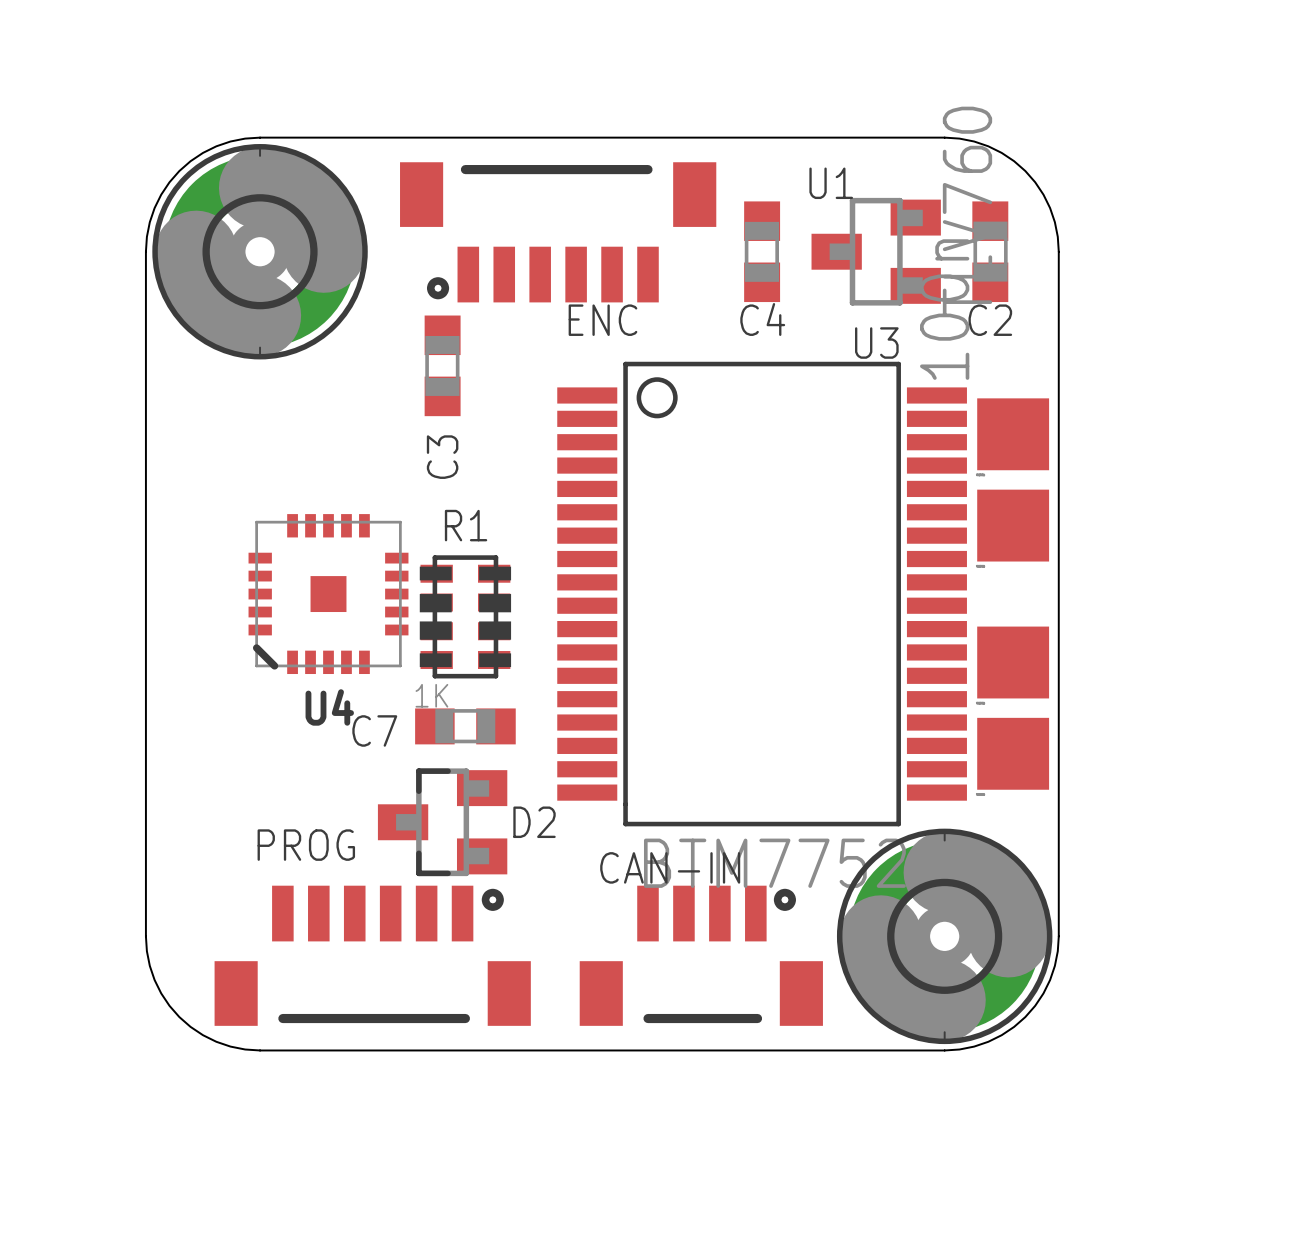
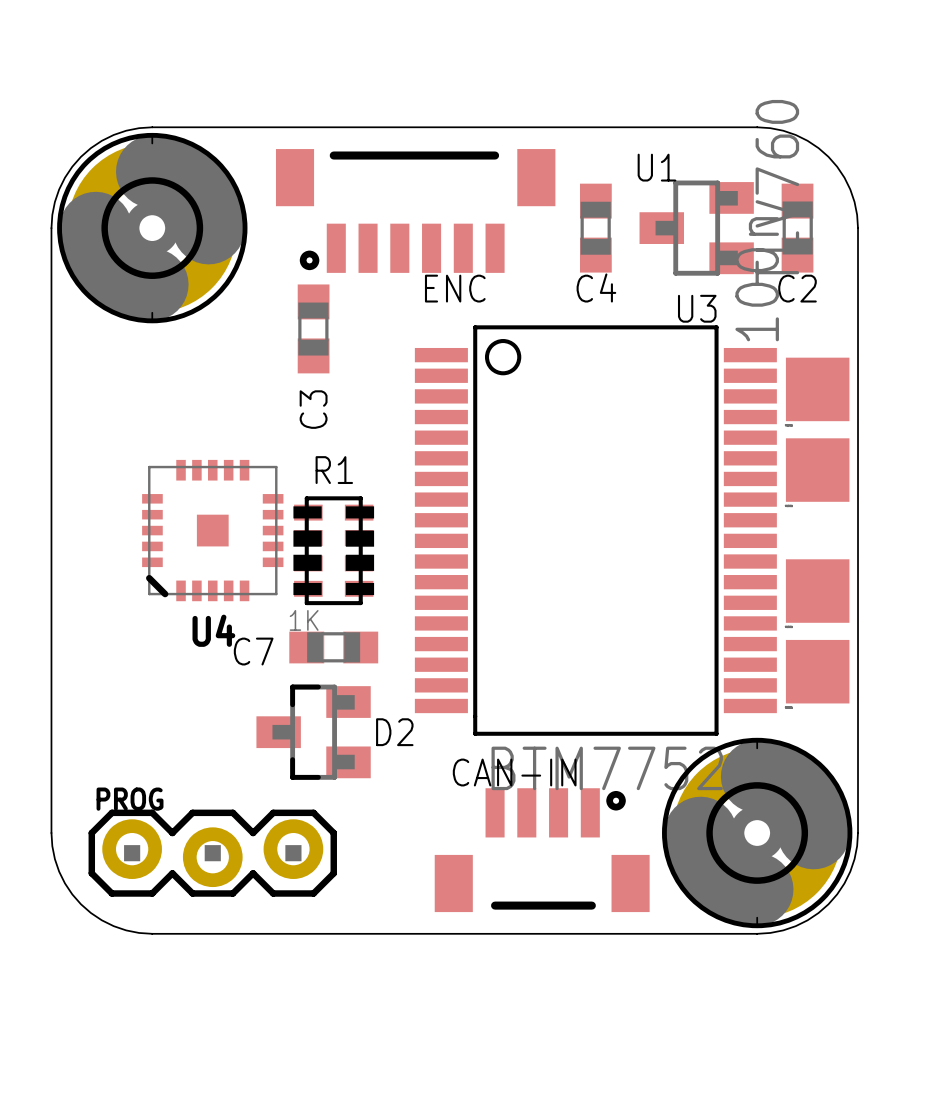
PROG: (372, 955) -> none
PROG: none -> (212, 853)

